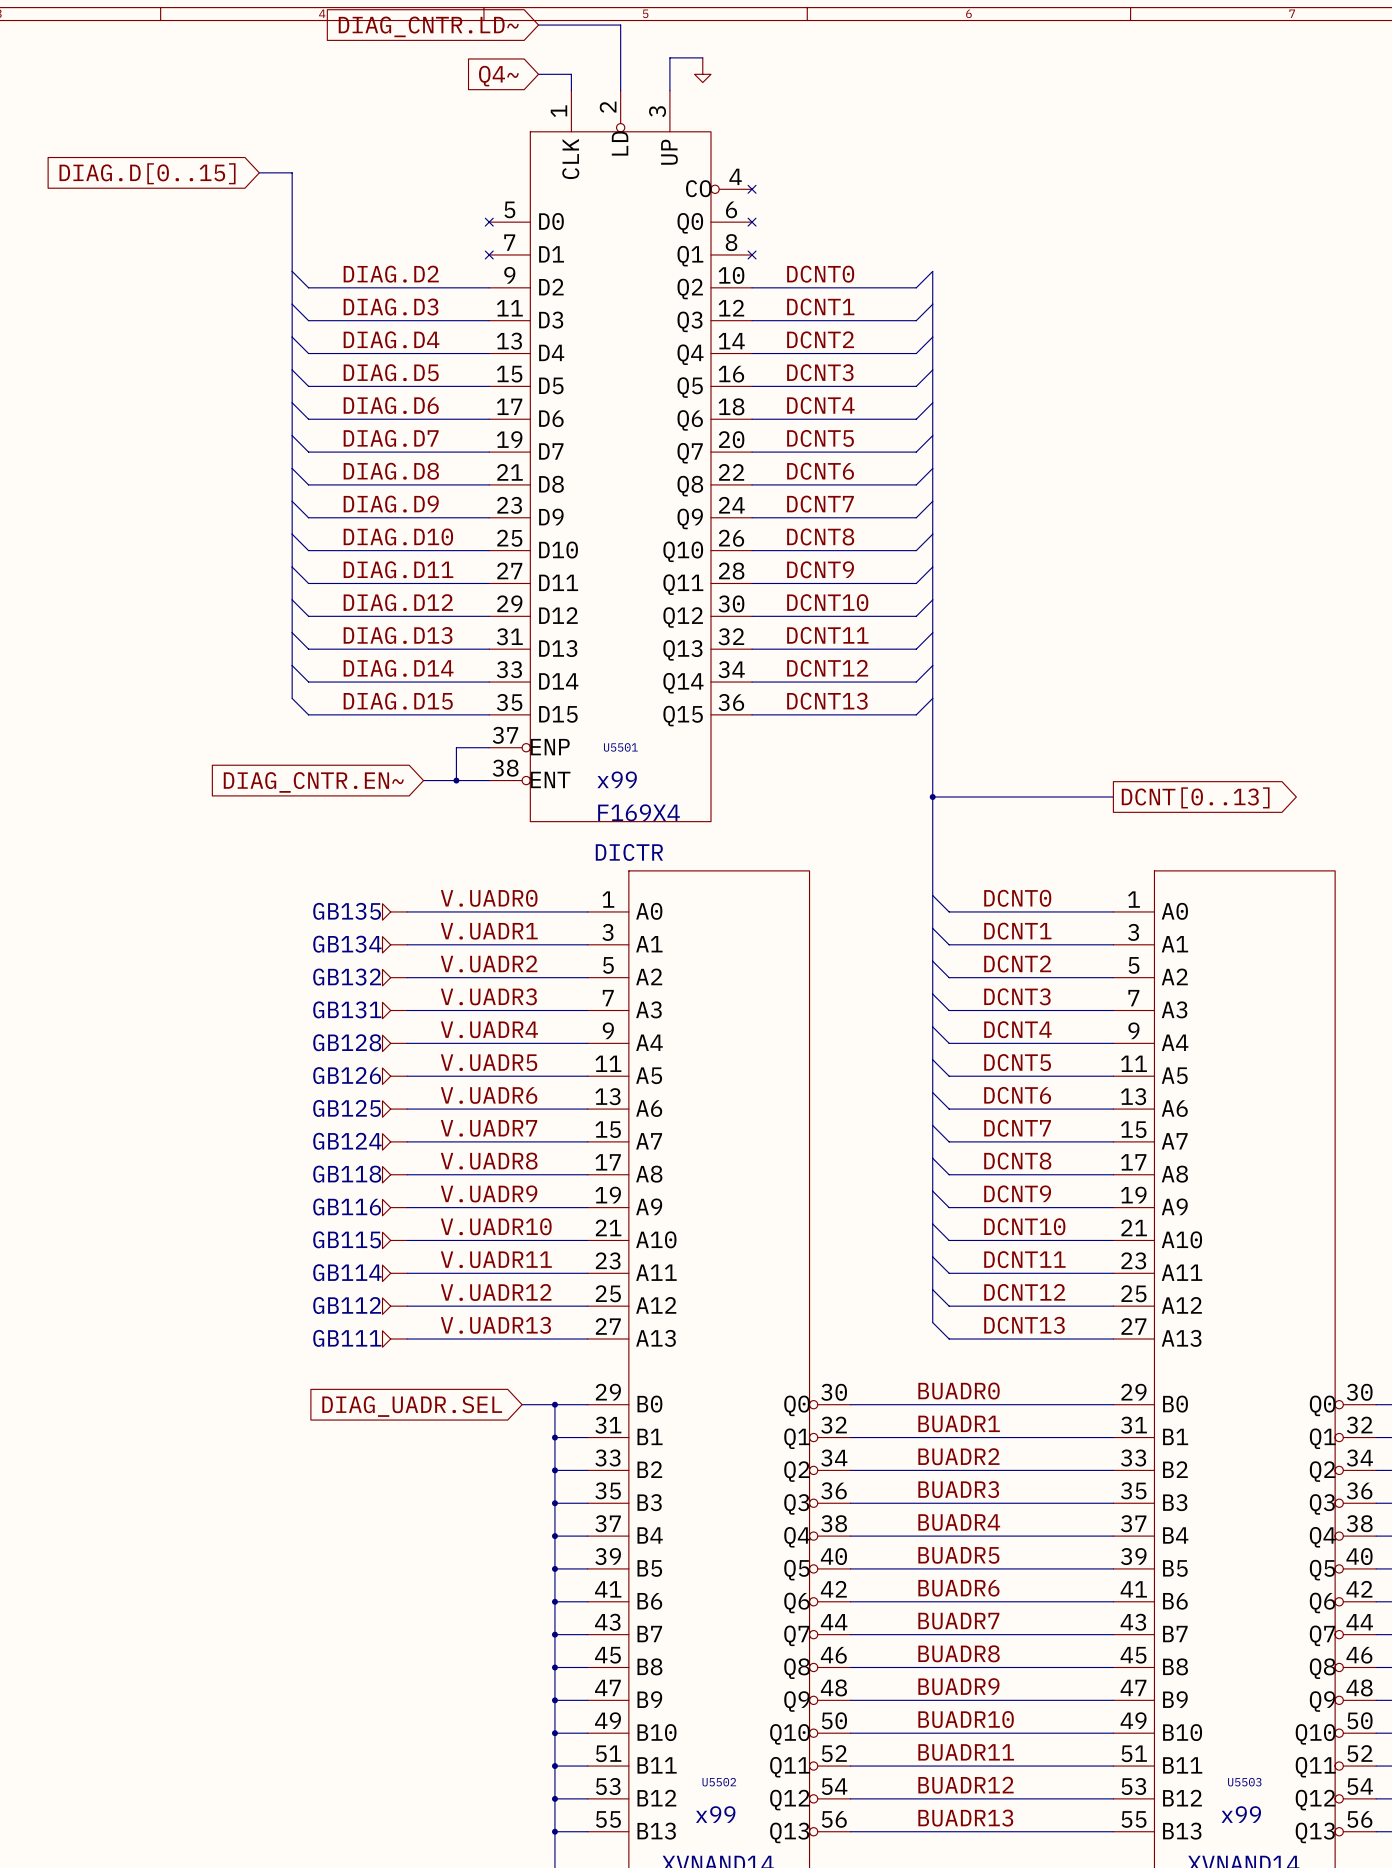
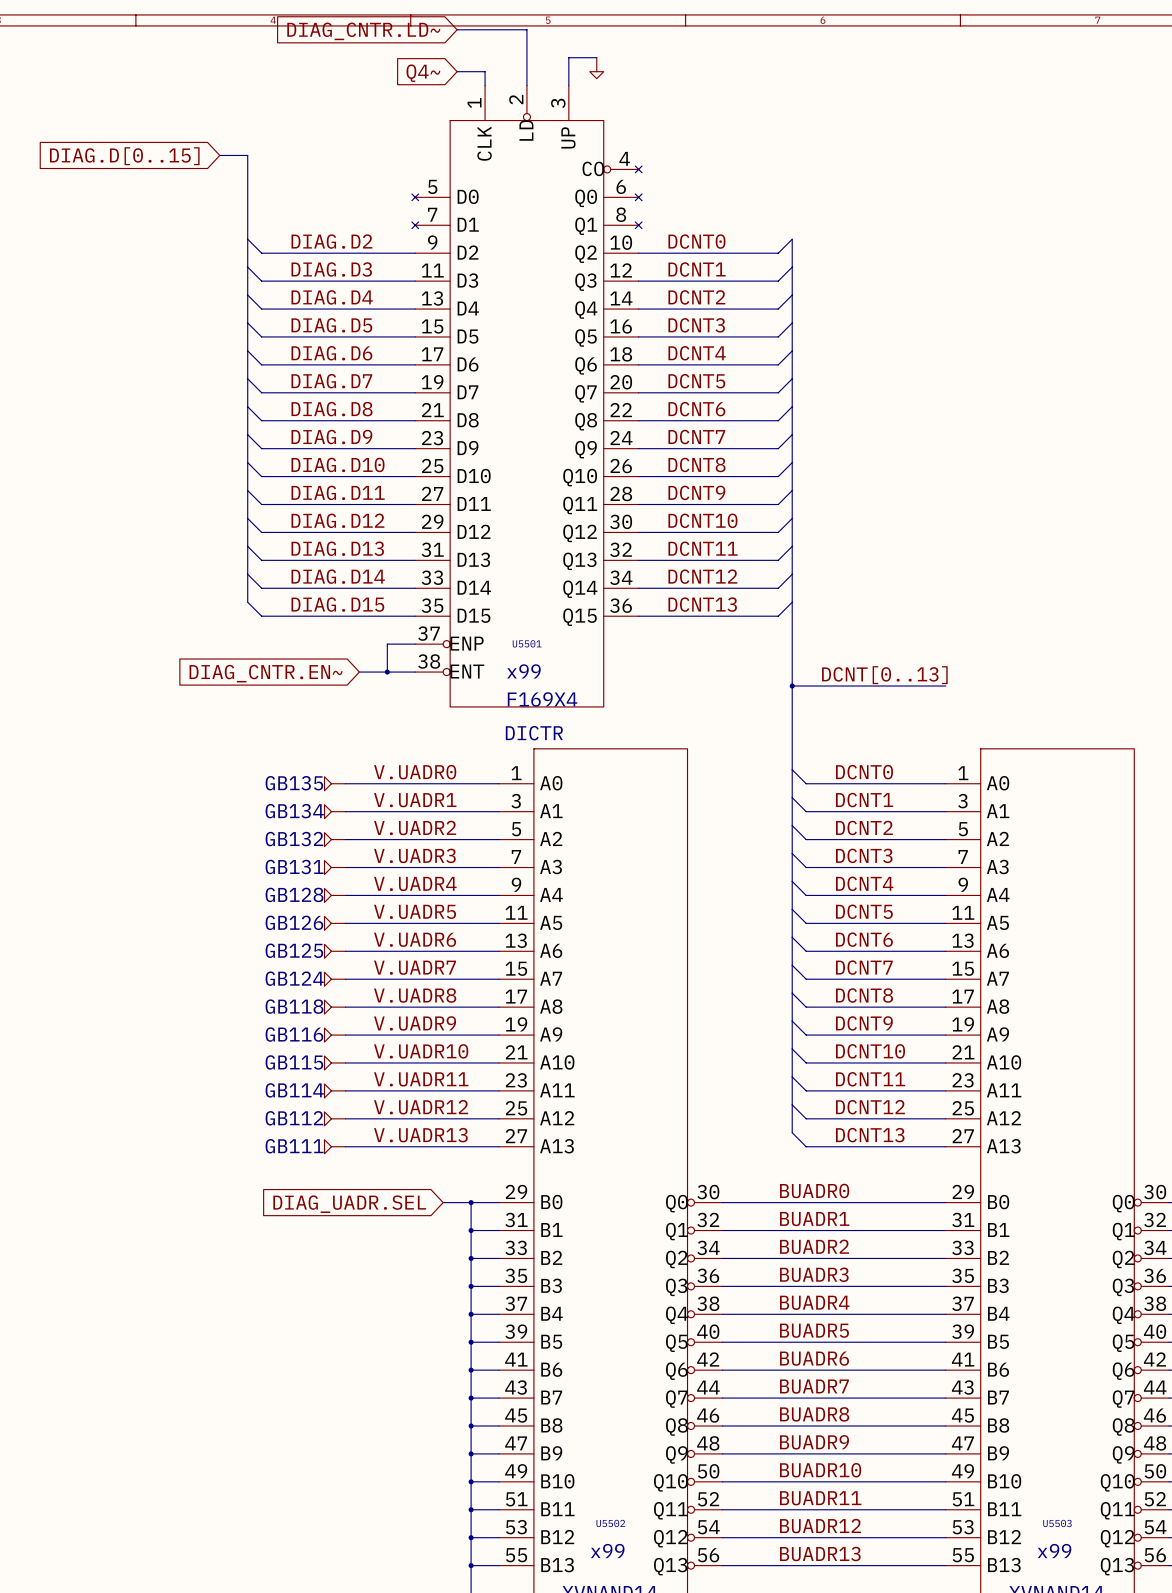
label: none -> DCNT[0..13] (884, 675)
global label: DCNT[0..13] (1195, 797) -> none

